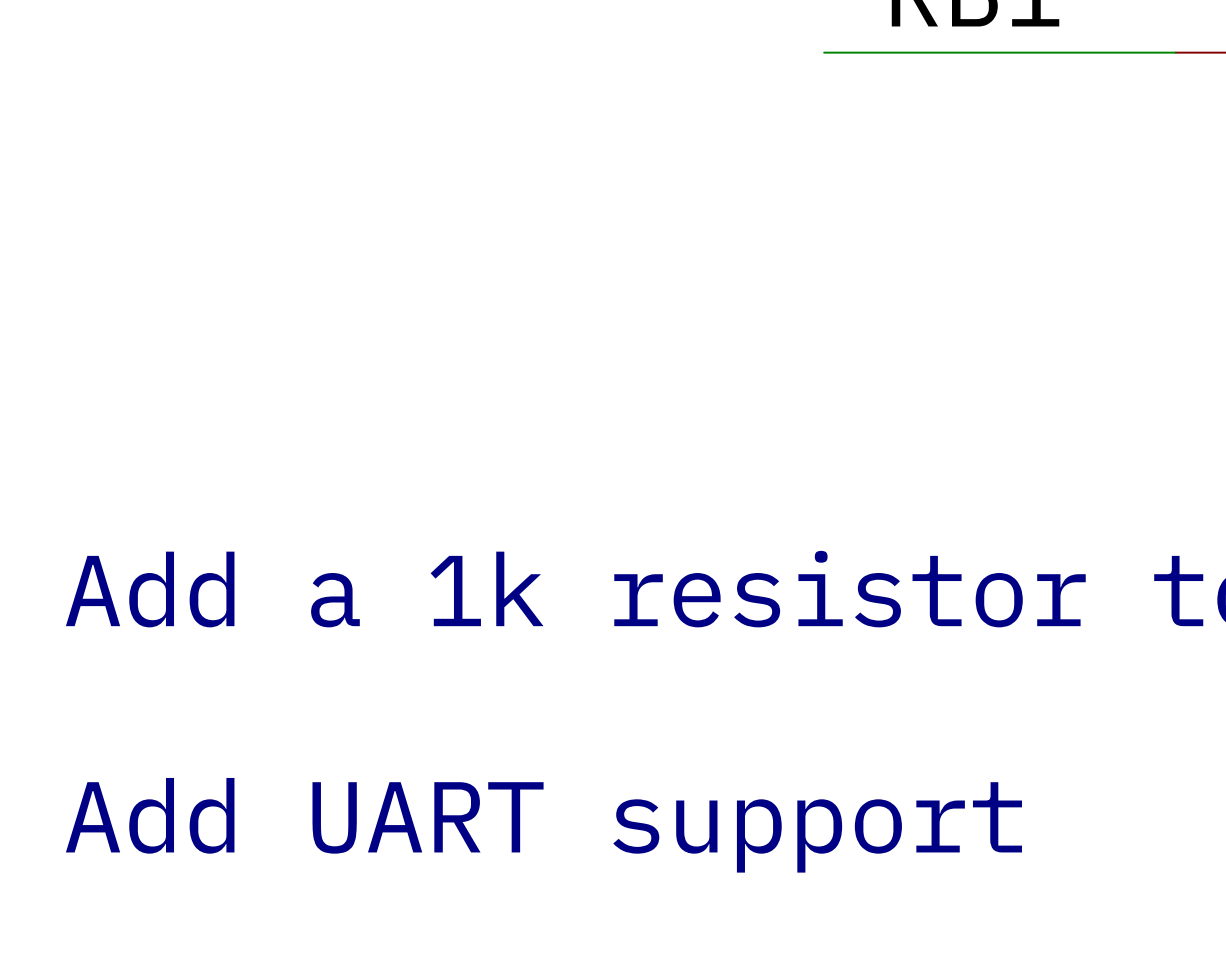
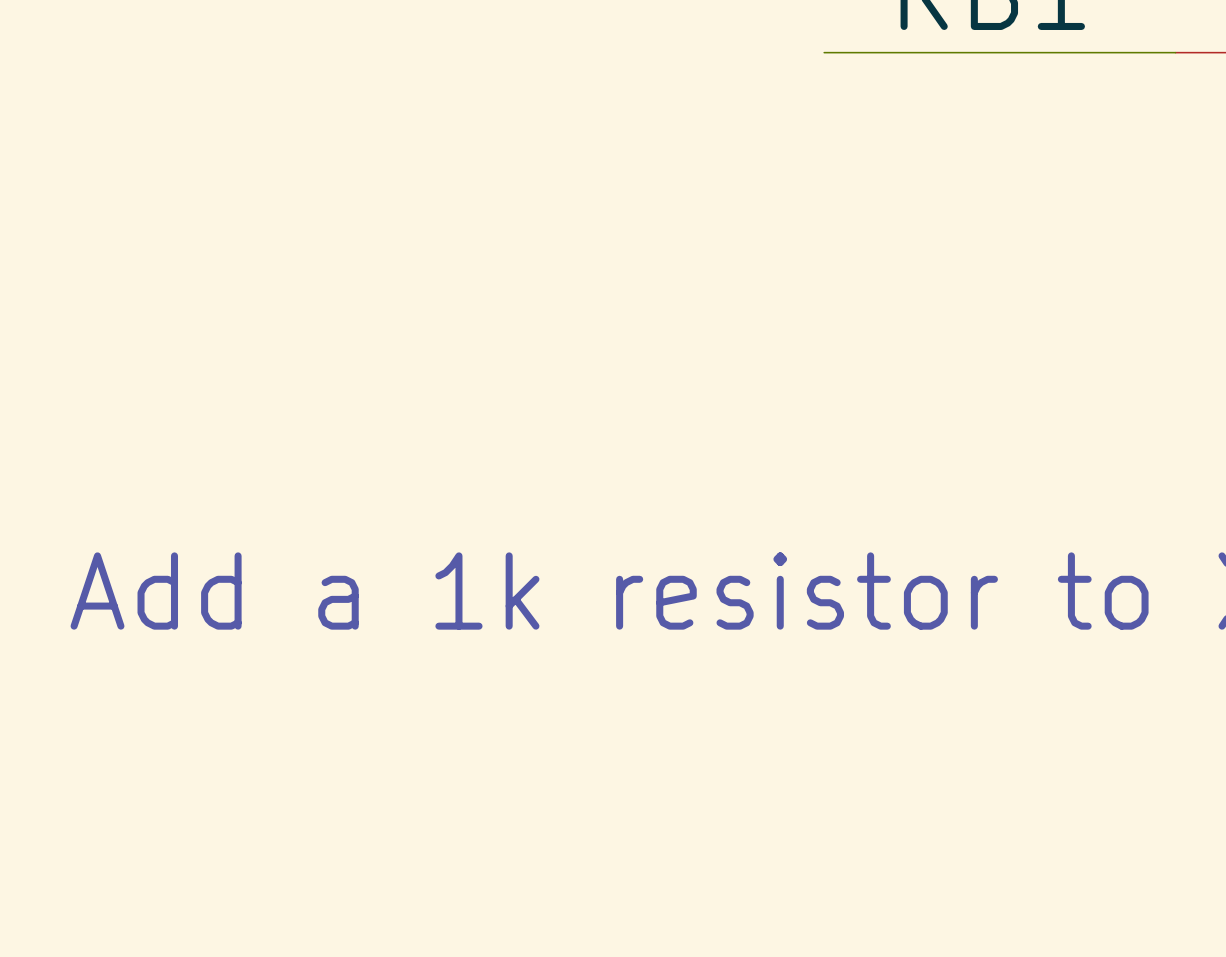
text: Add UART support (543, 825) -> none

